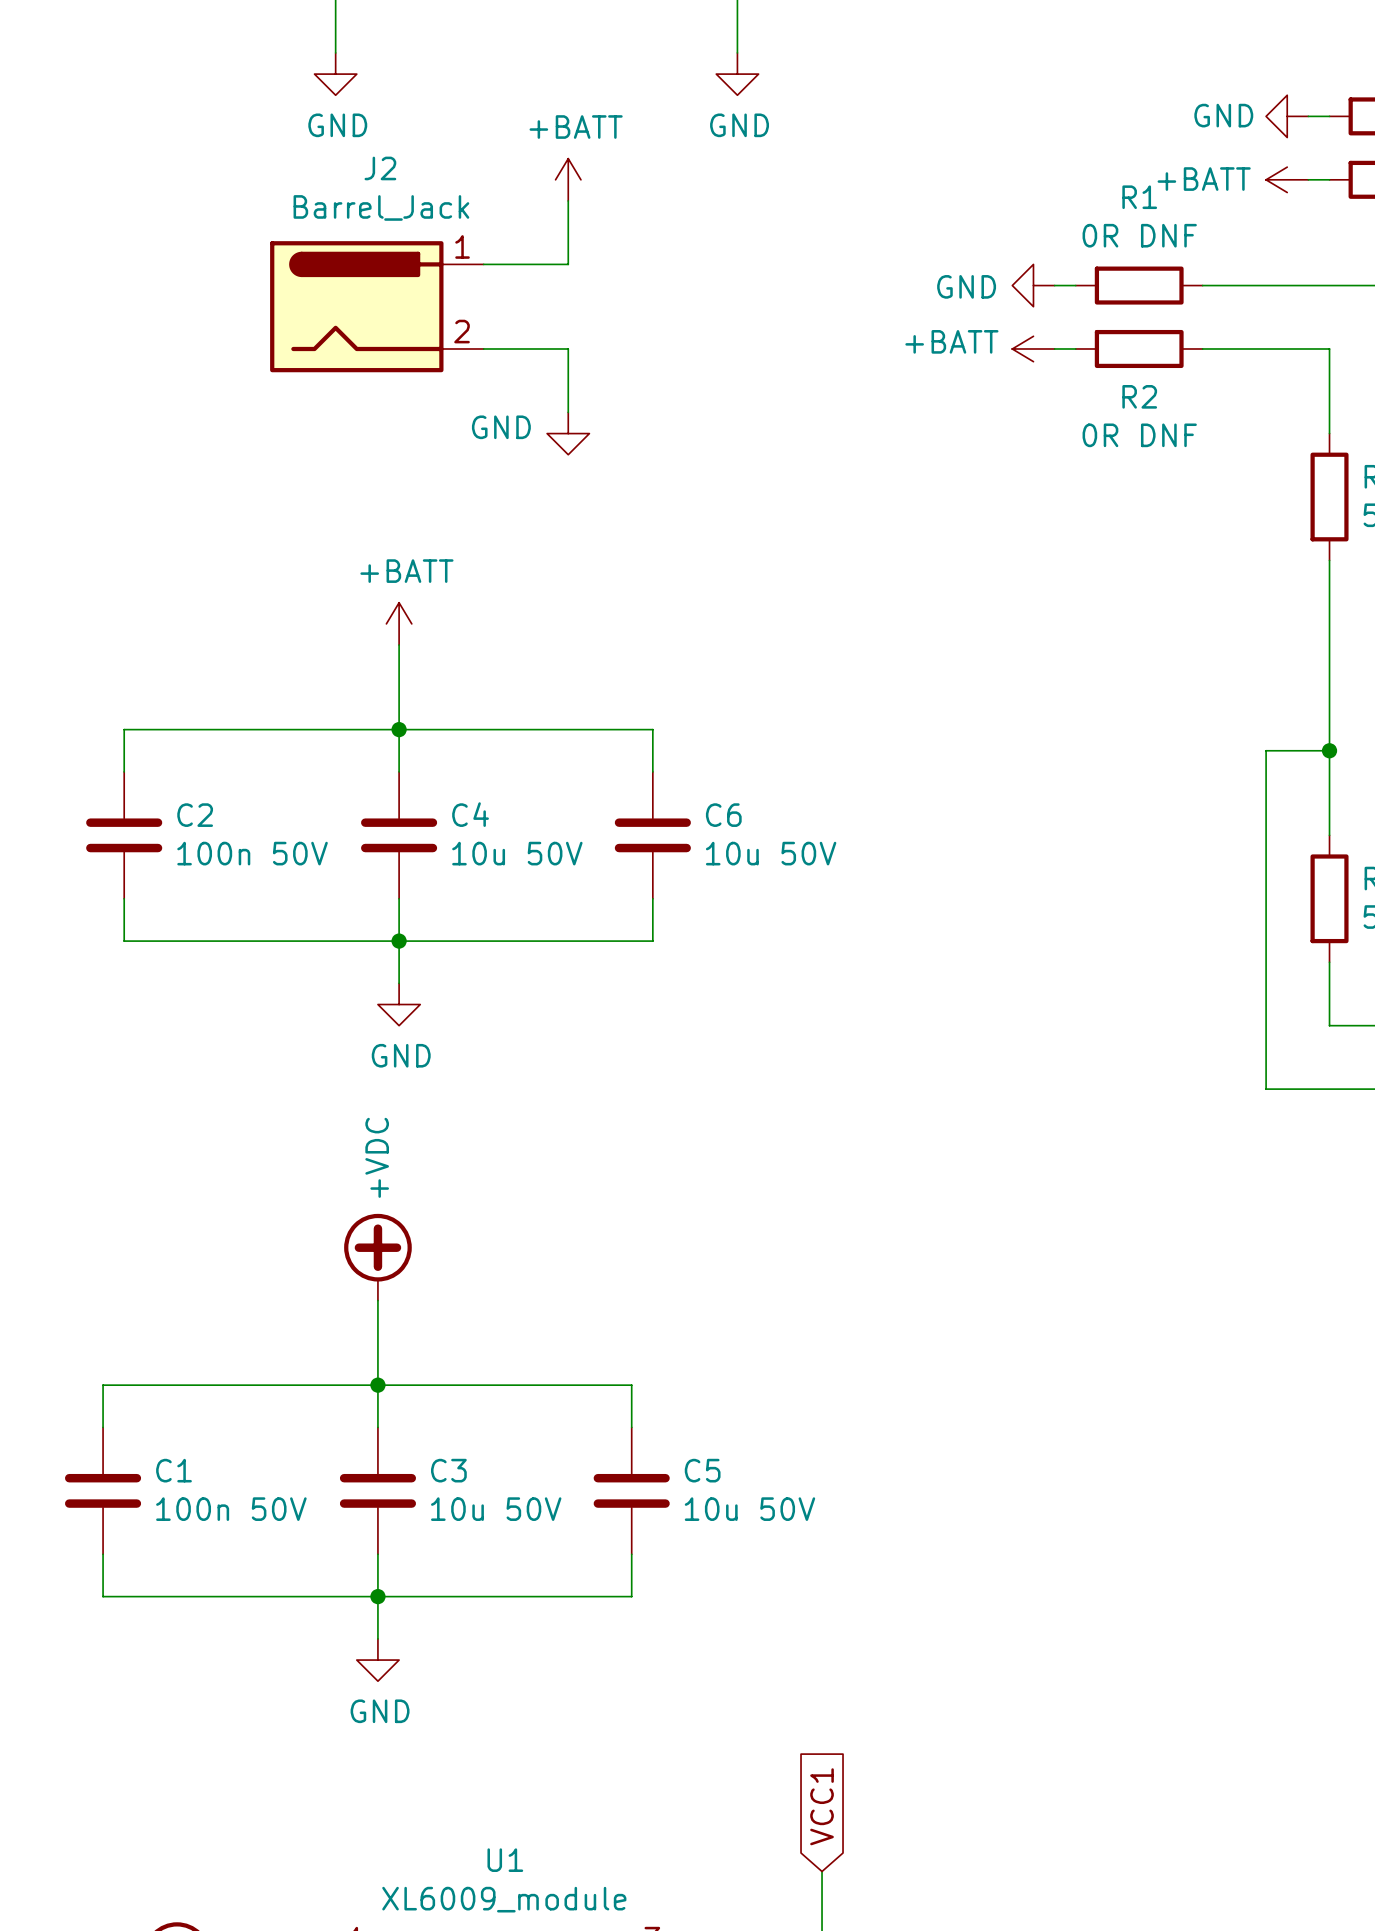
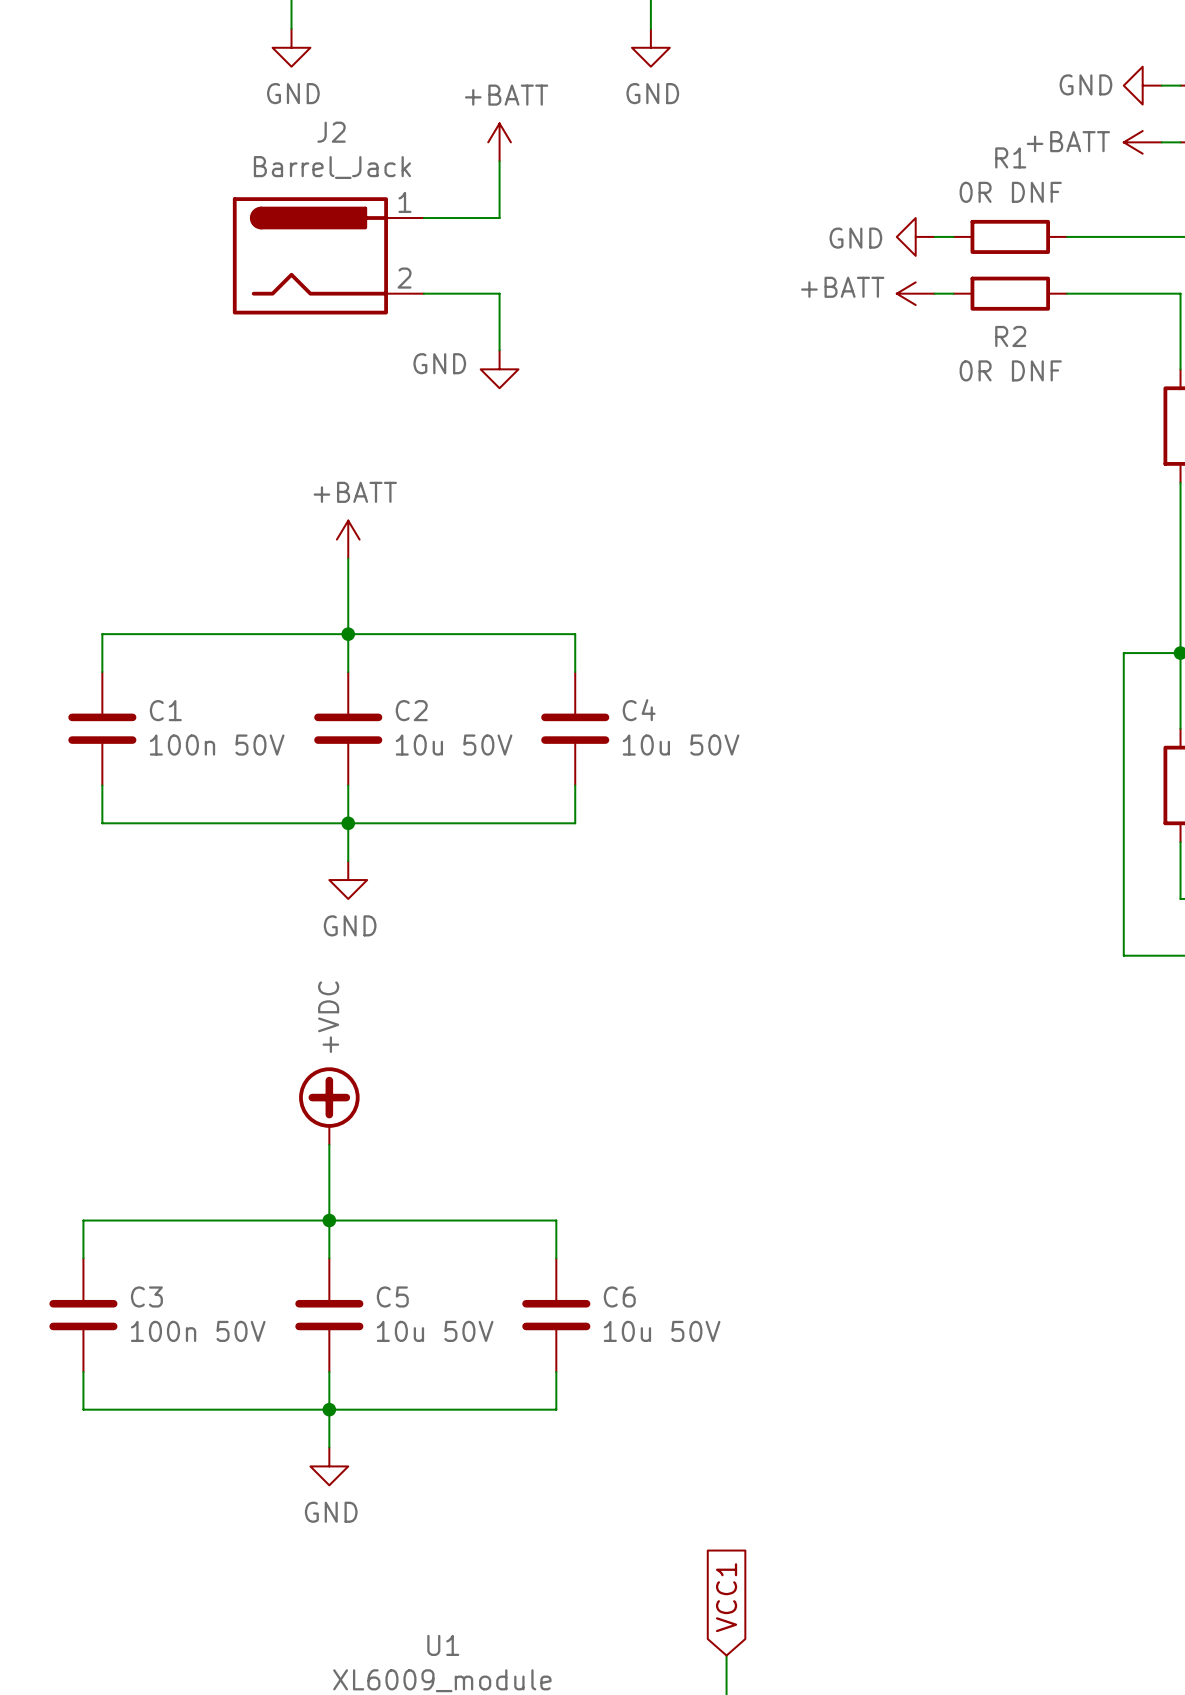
C4 name: C4 (470, 814) -> C2 (411, 710)
C2 name: C2 (195, 815) -> C1 (165, 710)
C6 name: C6 (723, 815) -> C4 (639, 710)
C1 name: C1 (174, 1470) -> C3 (146, 1296)
C3 name: C3 (448, 1470) -> C5 (392, 1296)
C5 name: C5 (702, 1470) -> C6 (619, 1296)

